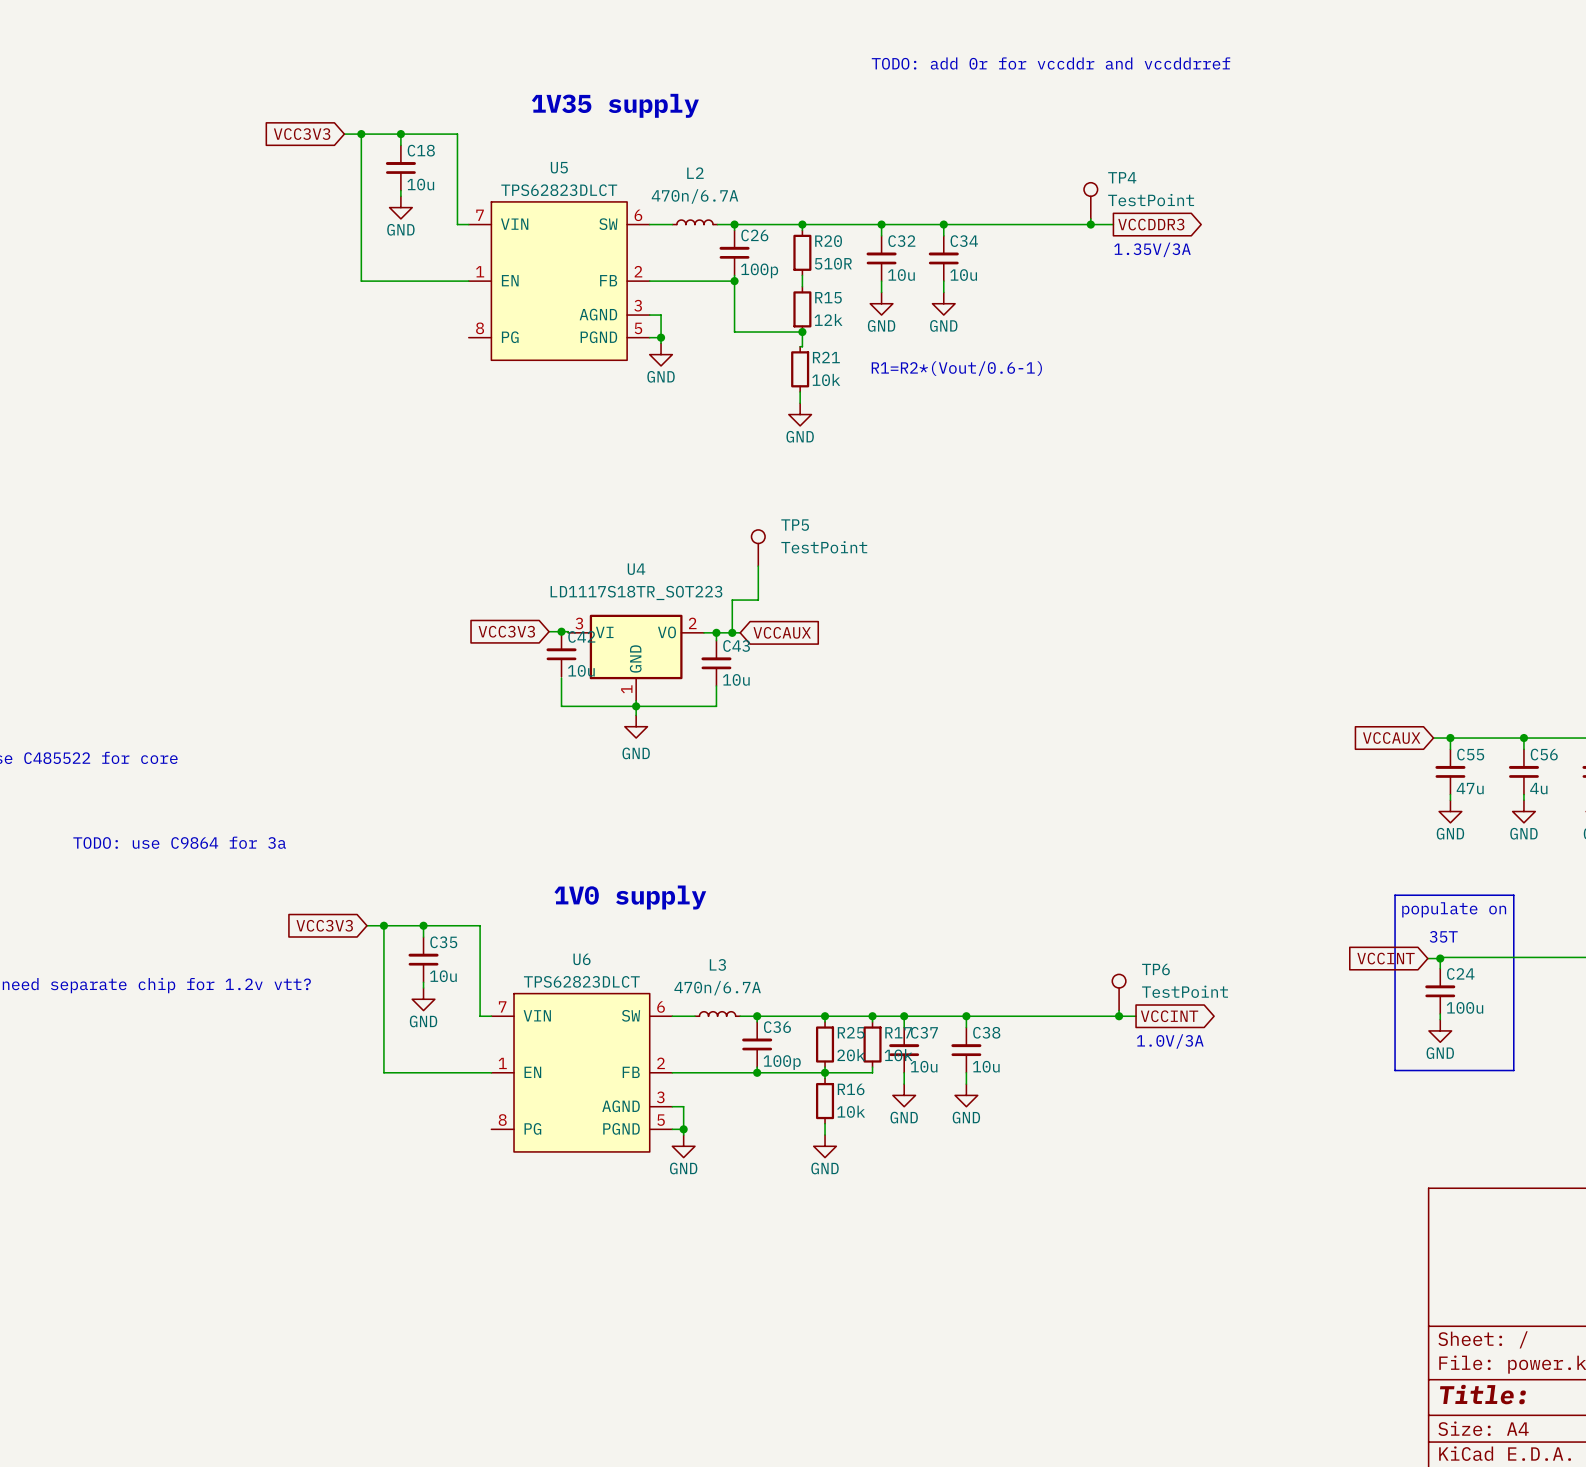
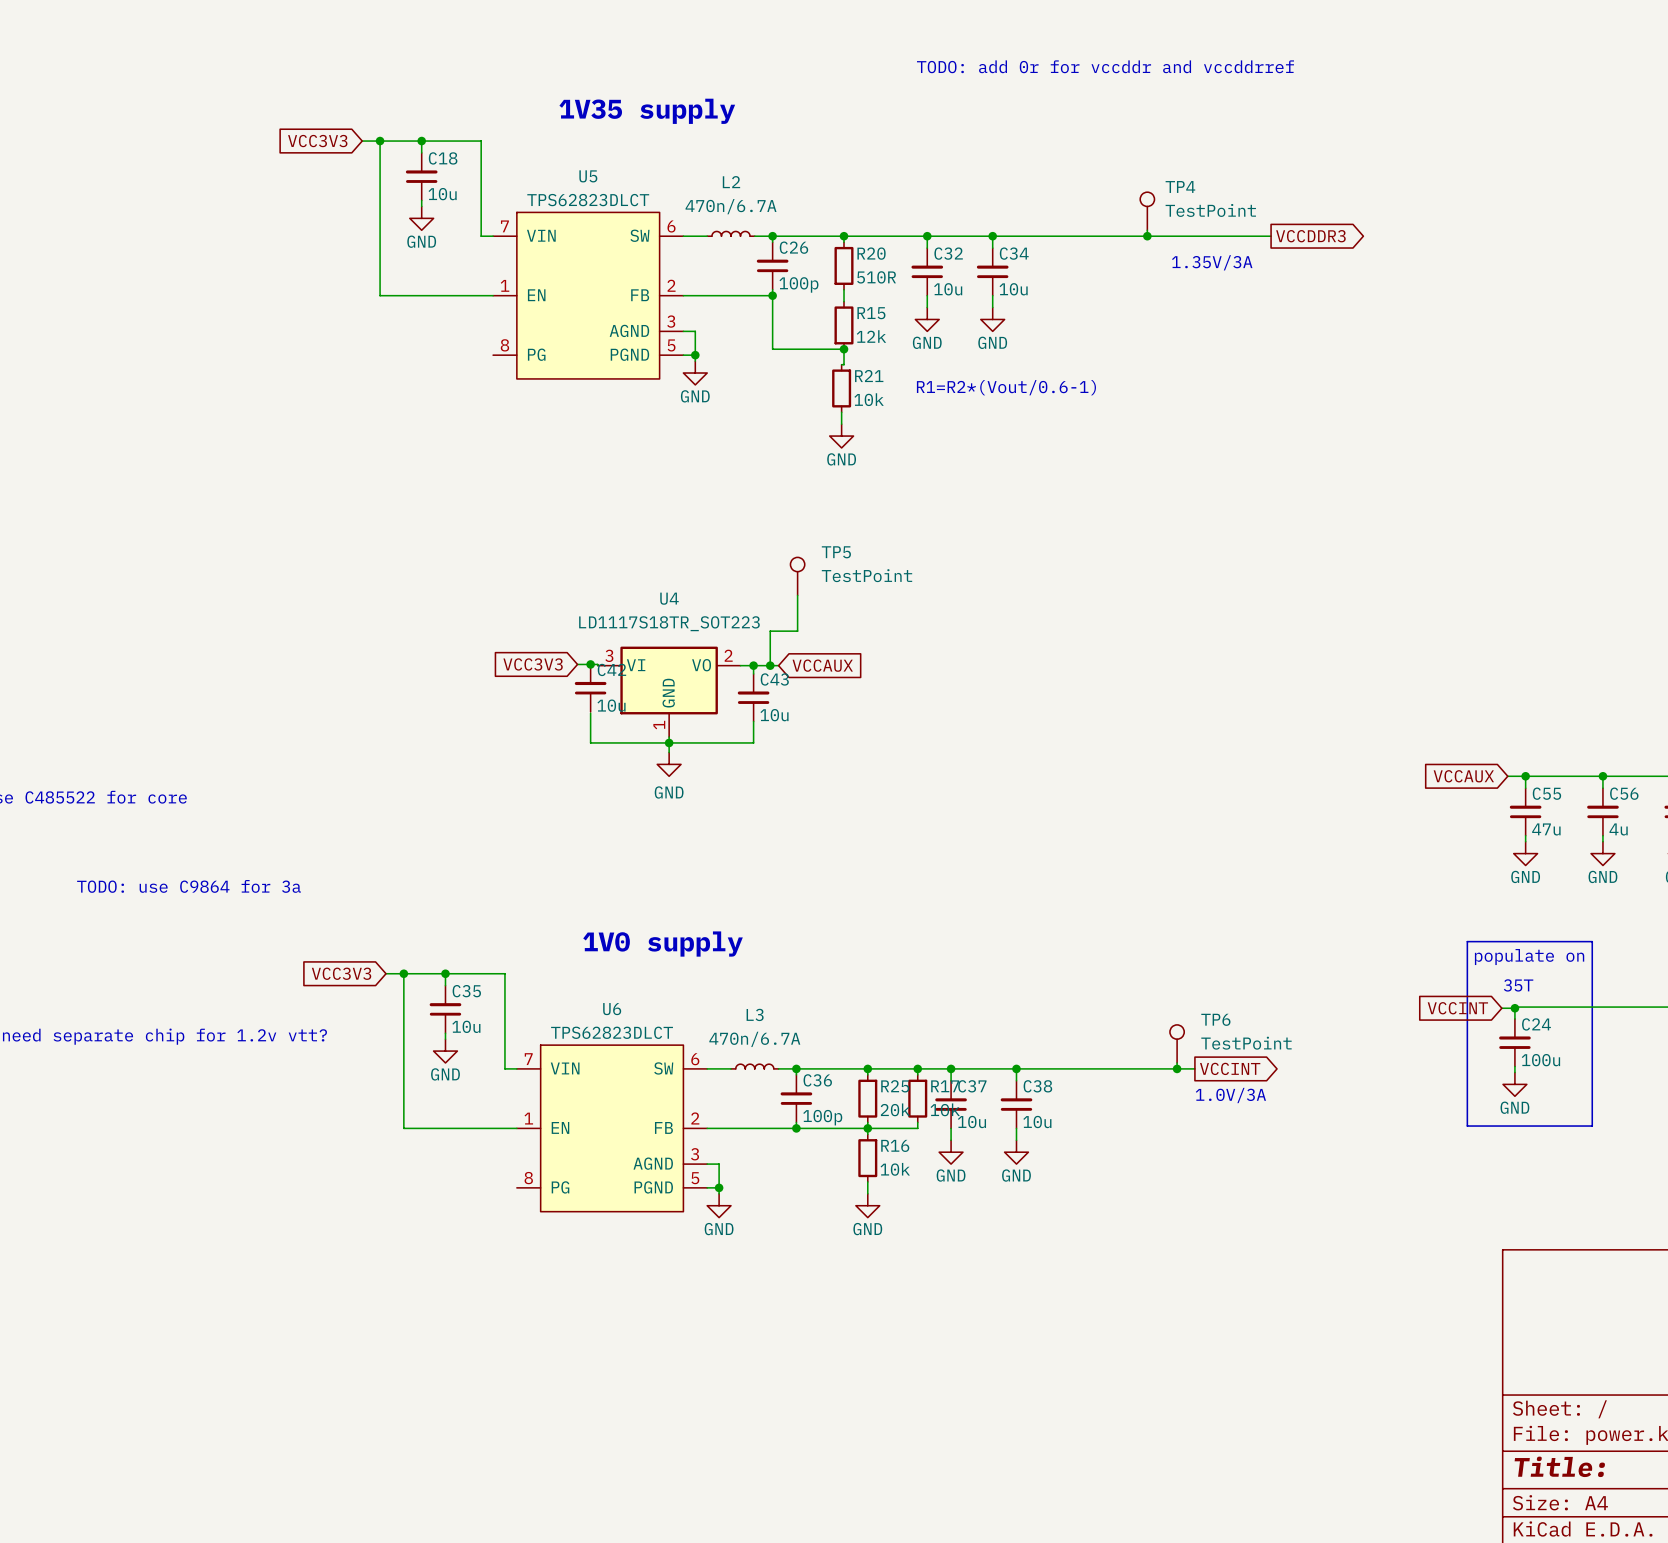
wire: none -> (1171, 236) (1271, 236)
global label position: VCCDDR3 (1151, 224) -> VCCDDR3 (1310, 236)

